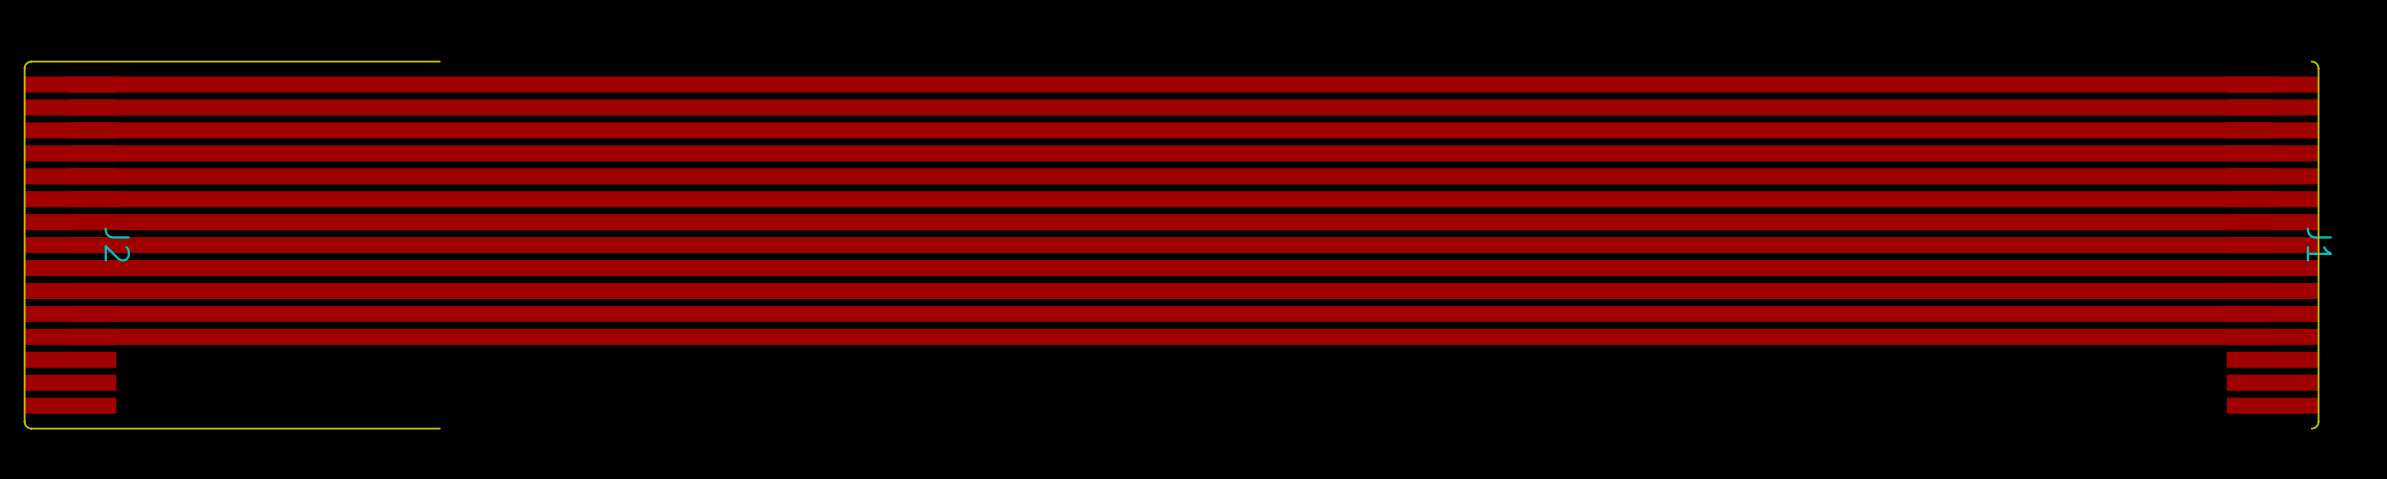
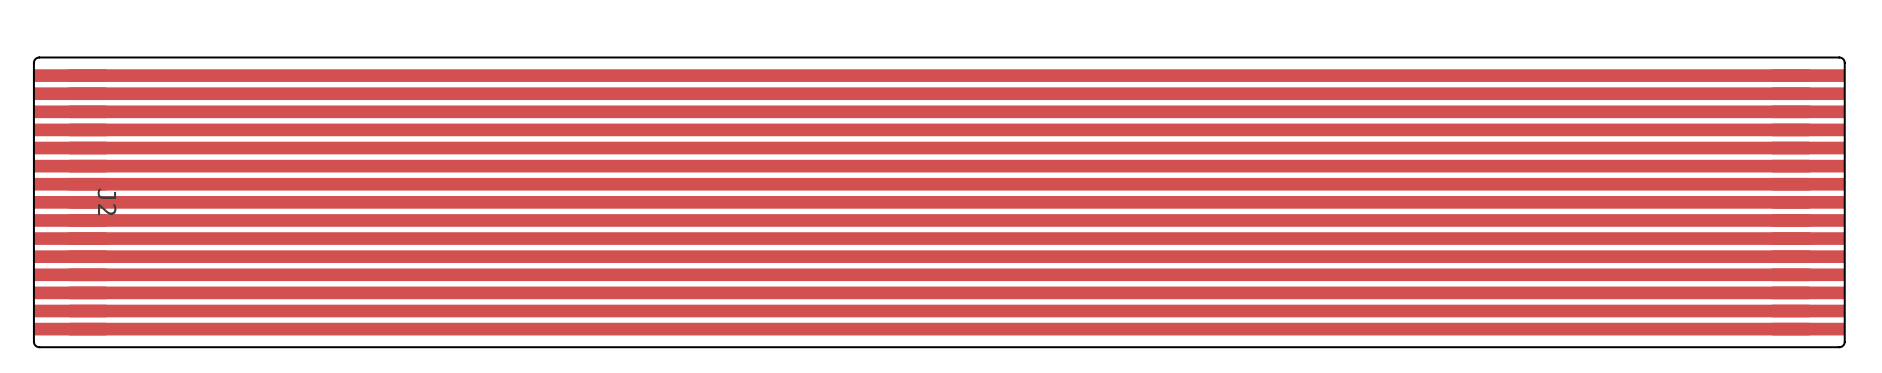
board edge: none -> (361, 57) (1839, 57)
J1 name: J1 (2319, 244) -> none
track: none -> (70, 292) (1808, 292)
track: none -> (70, 311) (1808, 311)
track: none -> (70, 329) (1808, 329)
board edge: none -> (361, 347) (1839, 347)

